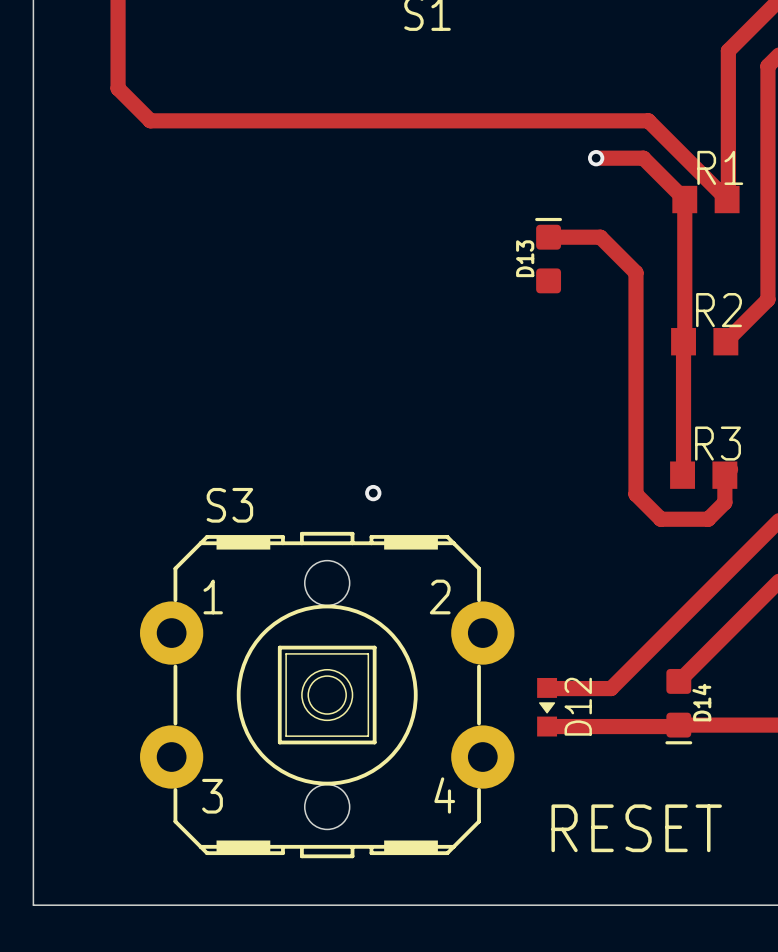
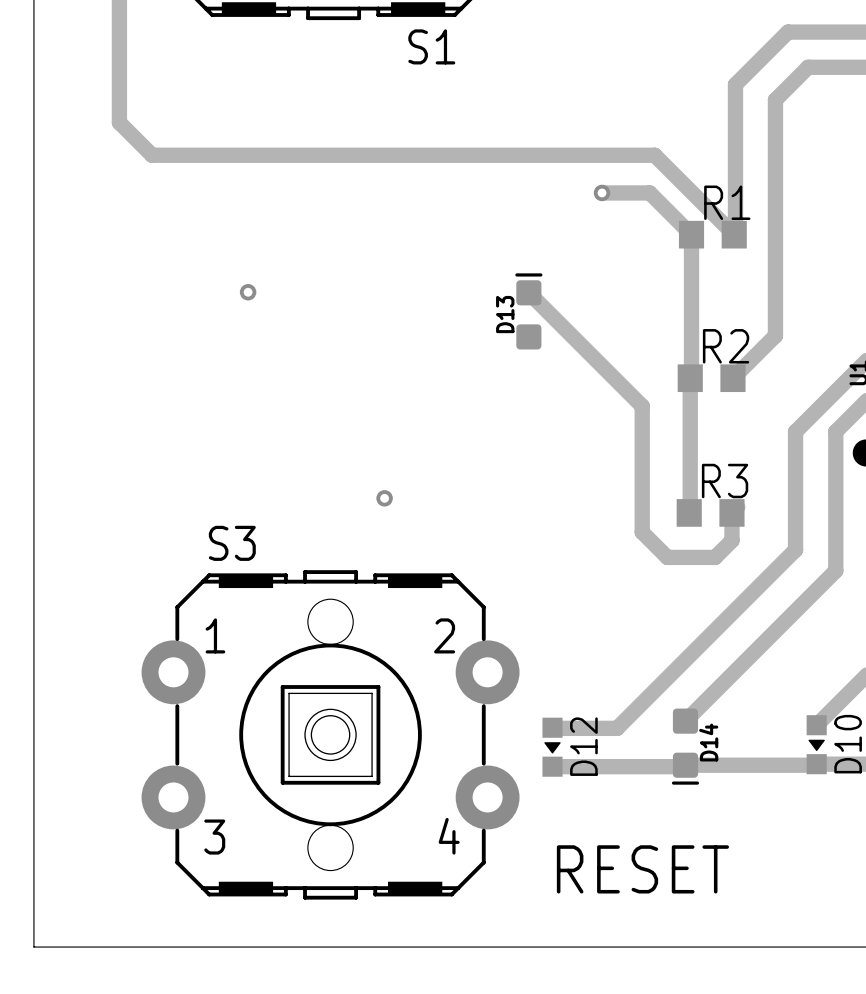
track: (548, 237) (600, 237) (635, 272) (635, 369) -> (528, 292) (642, 406)
D13 position: (548, 255) -> (528, 311)
via: none -> (248, 292)
via position: (373, 493) -> (384, 498)

